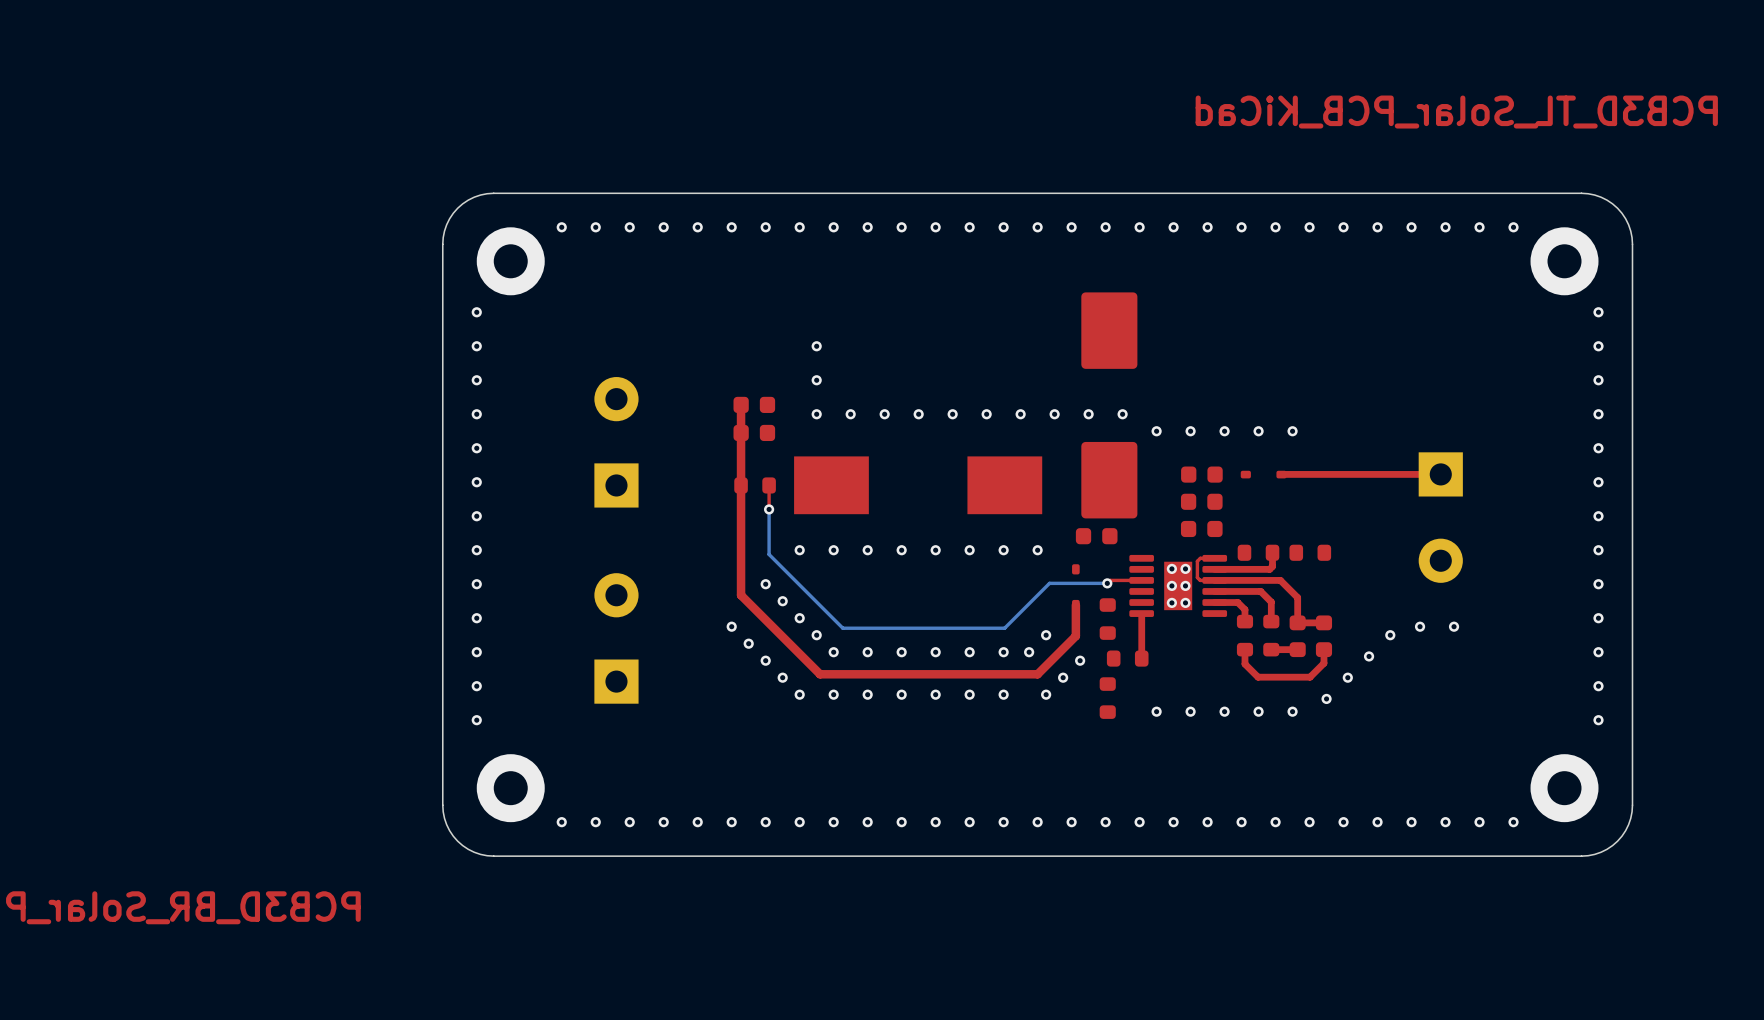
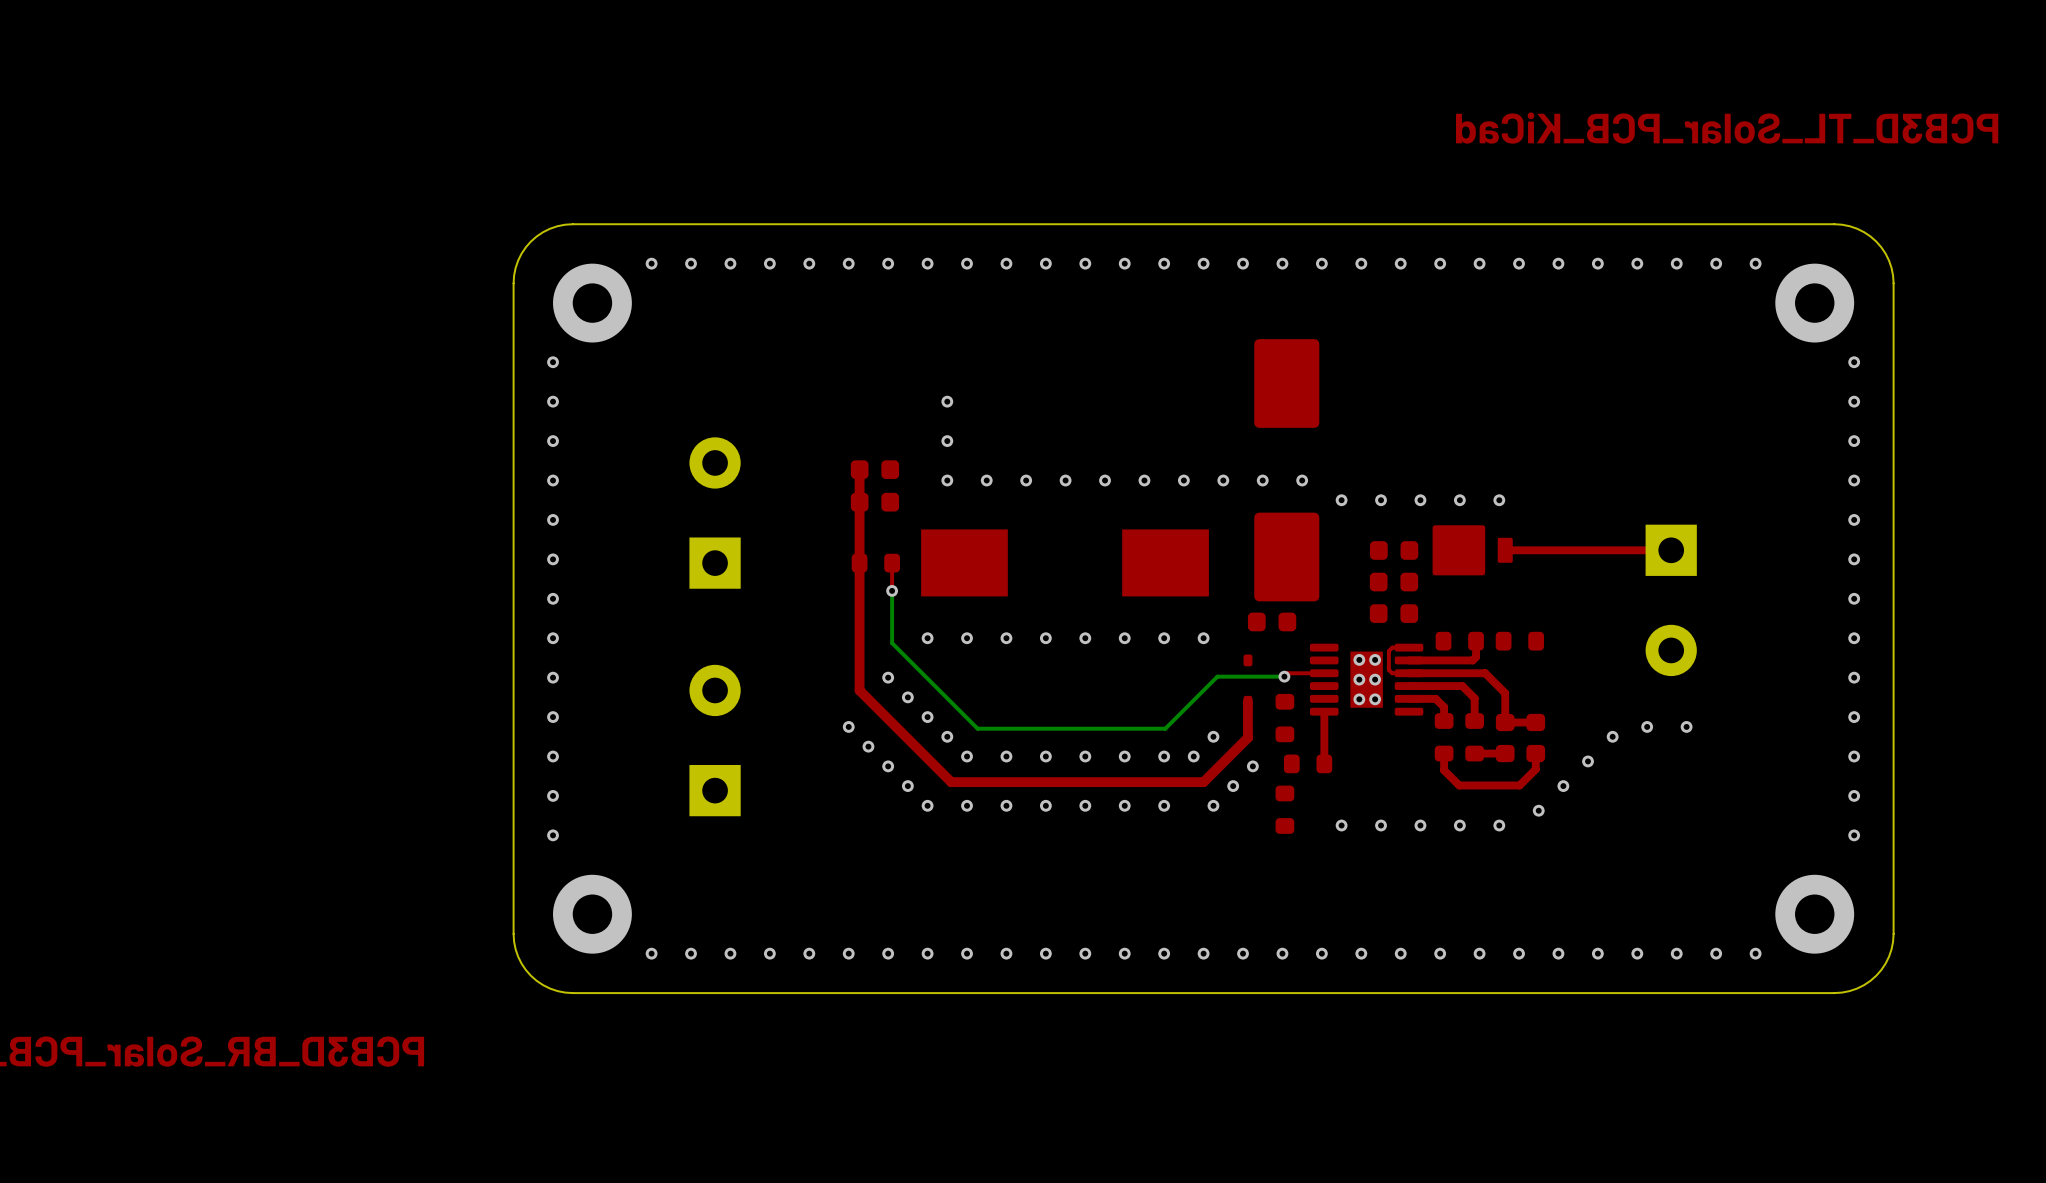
part footprint: [1240, 470, 1287, 479] -> [1432, 525, 1513, 576]
top track: (1297, 474) (1281, 474) -> none

